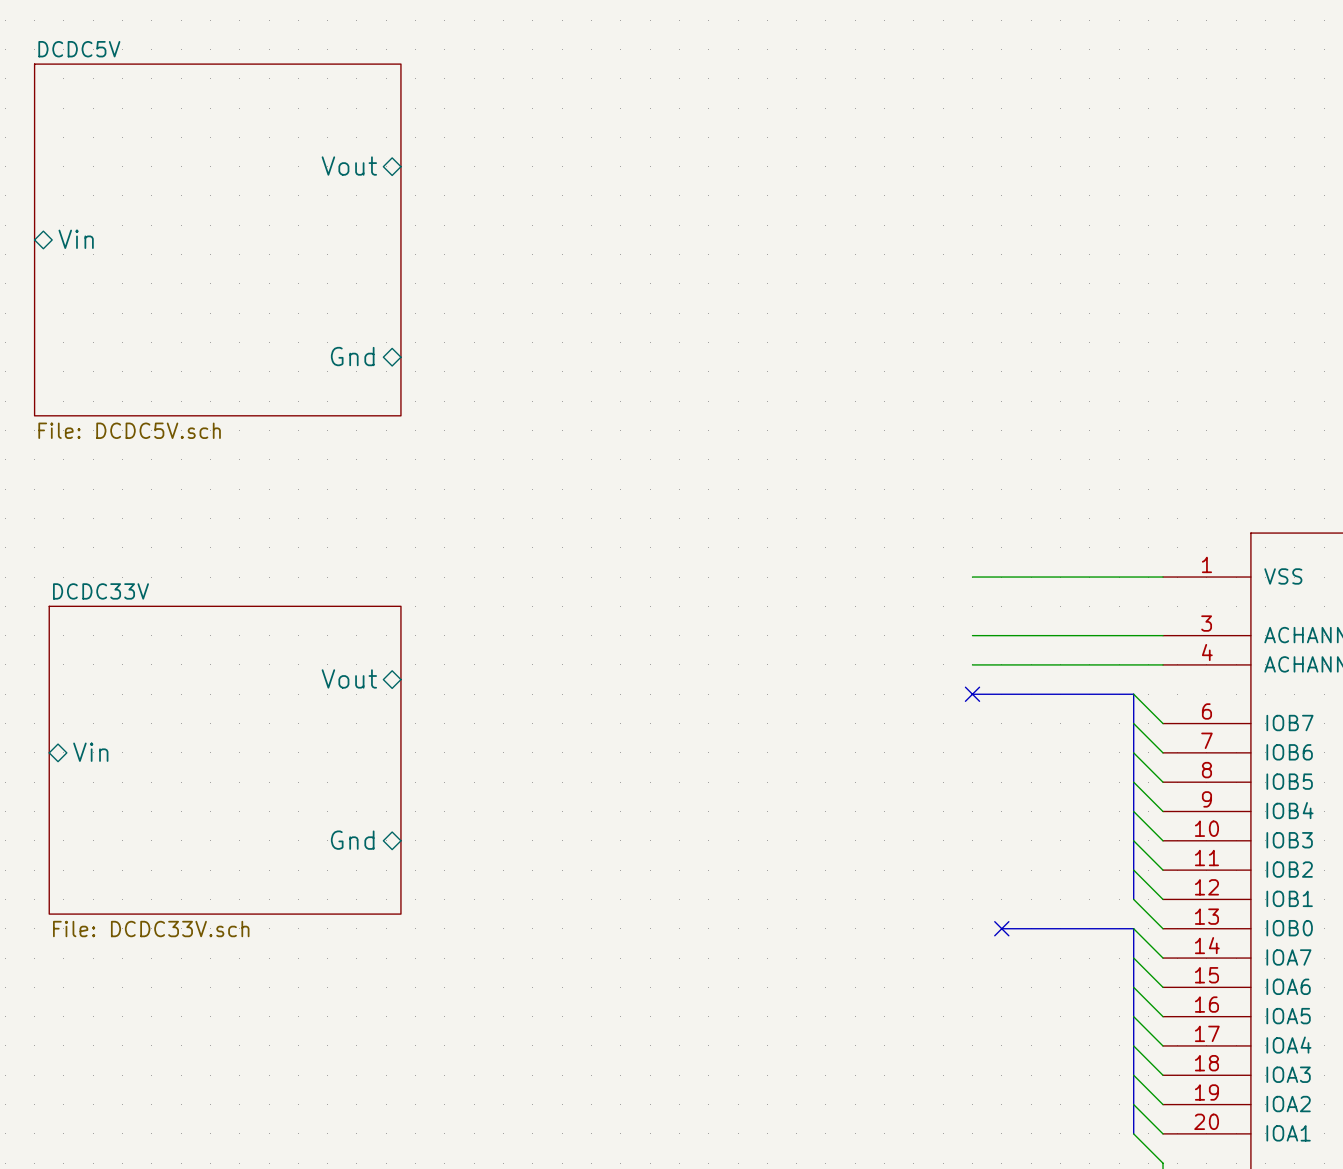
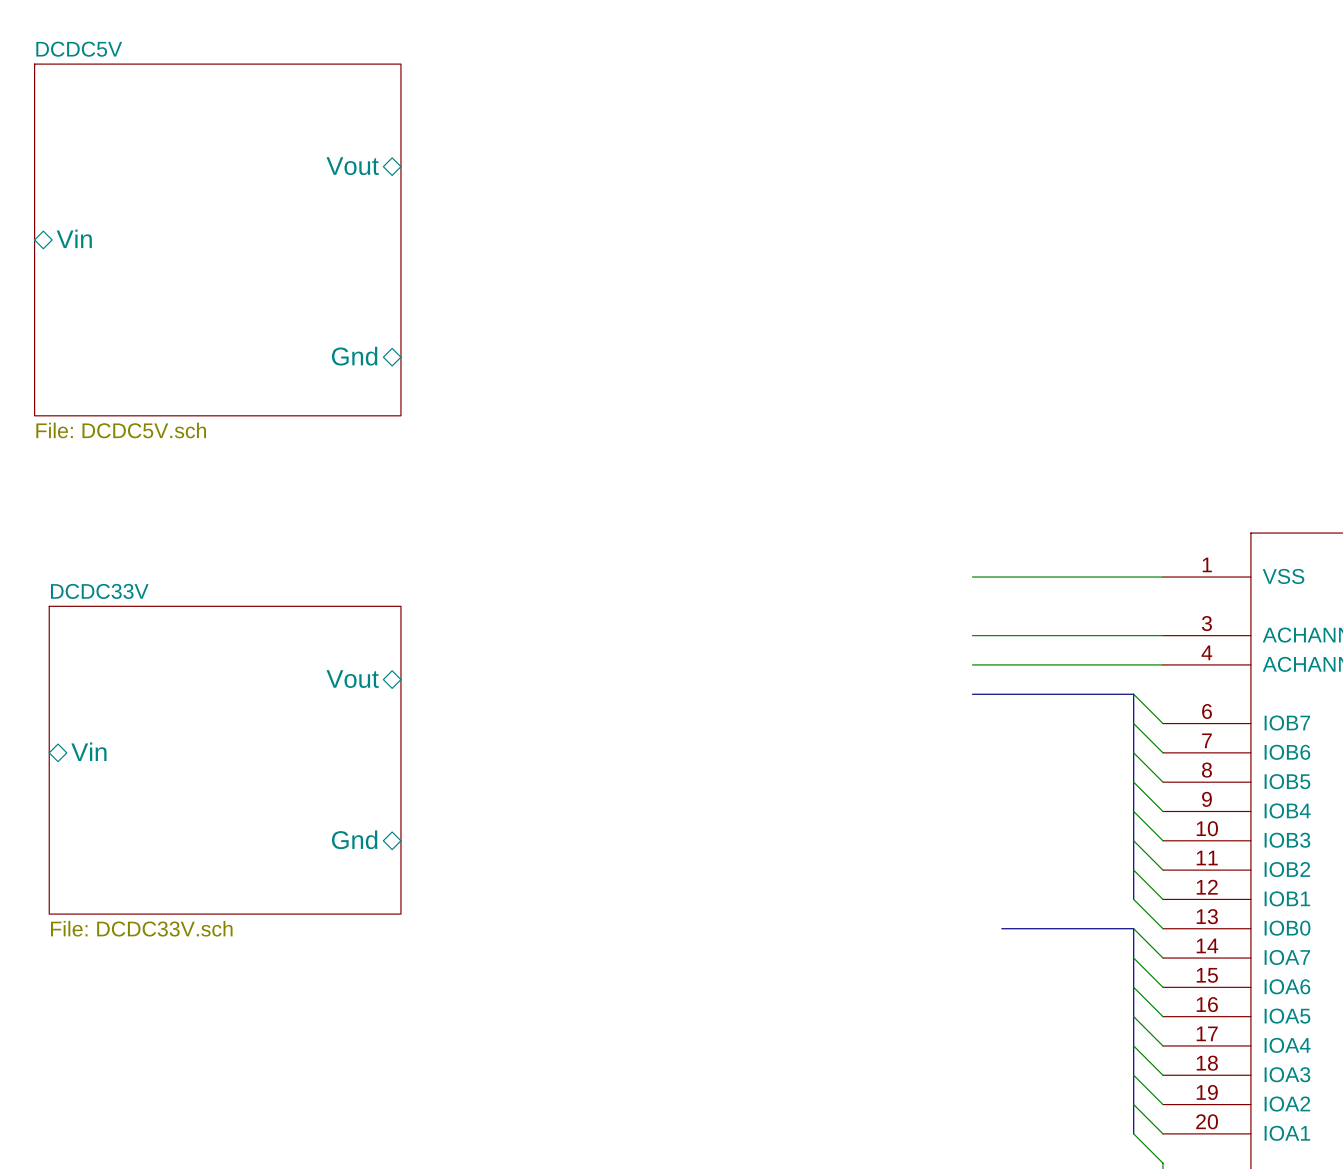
no-connect mark: (972, 694) -> none
no-connect mark: (1001, 928) -> none

